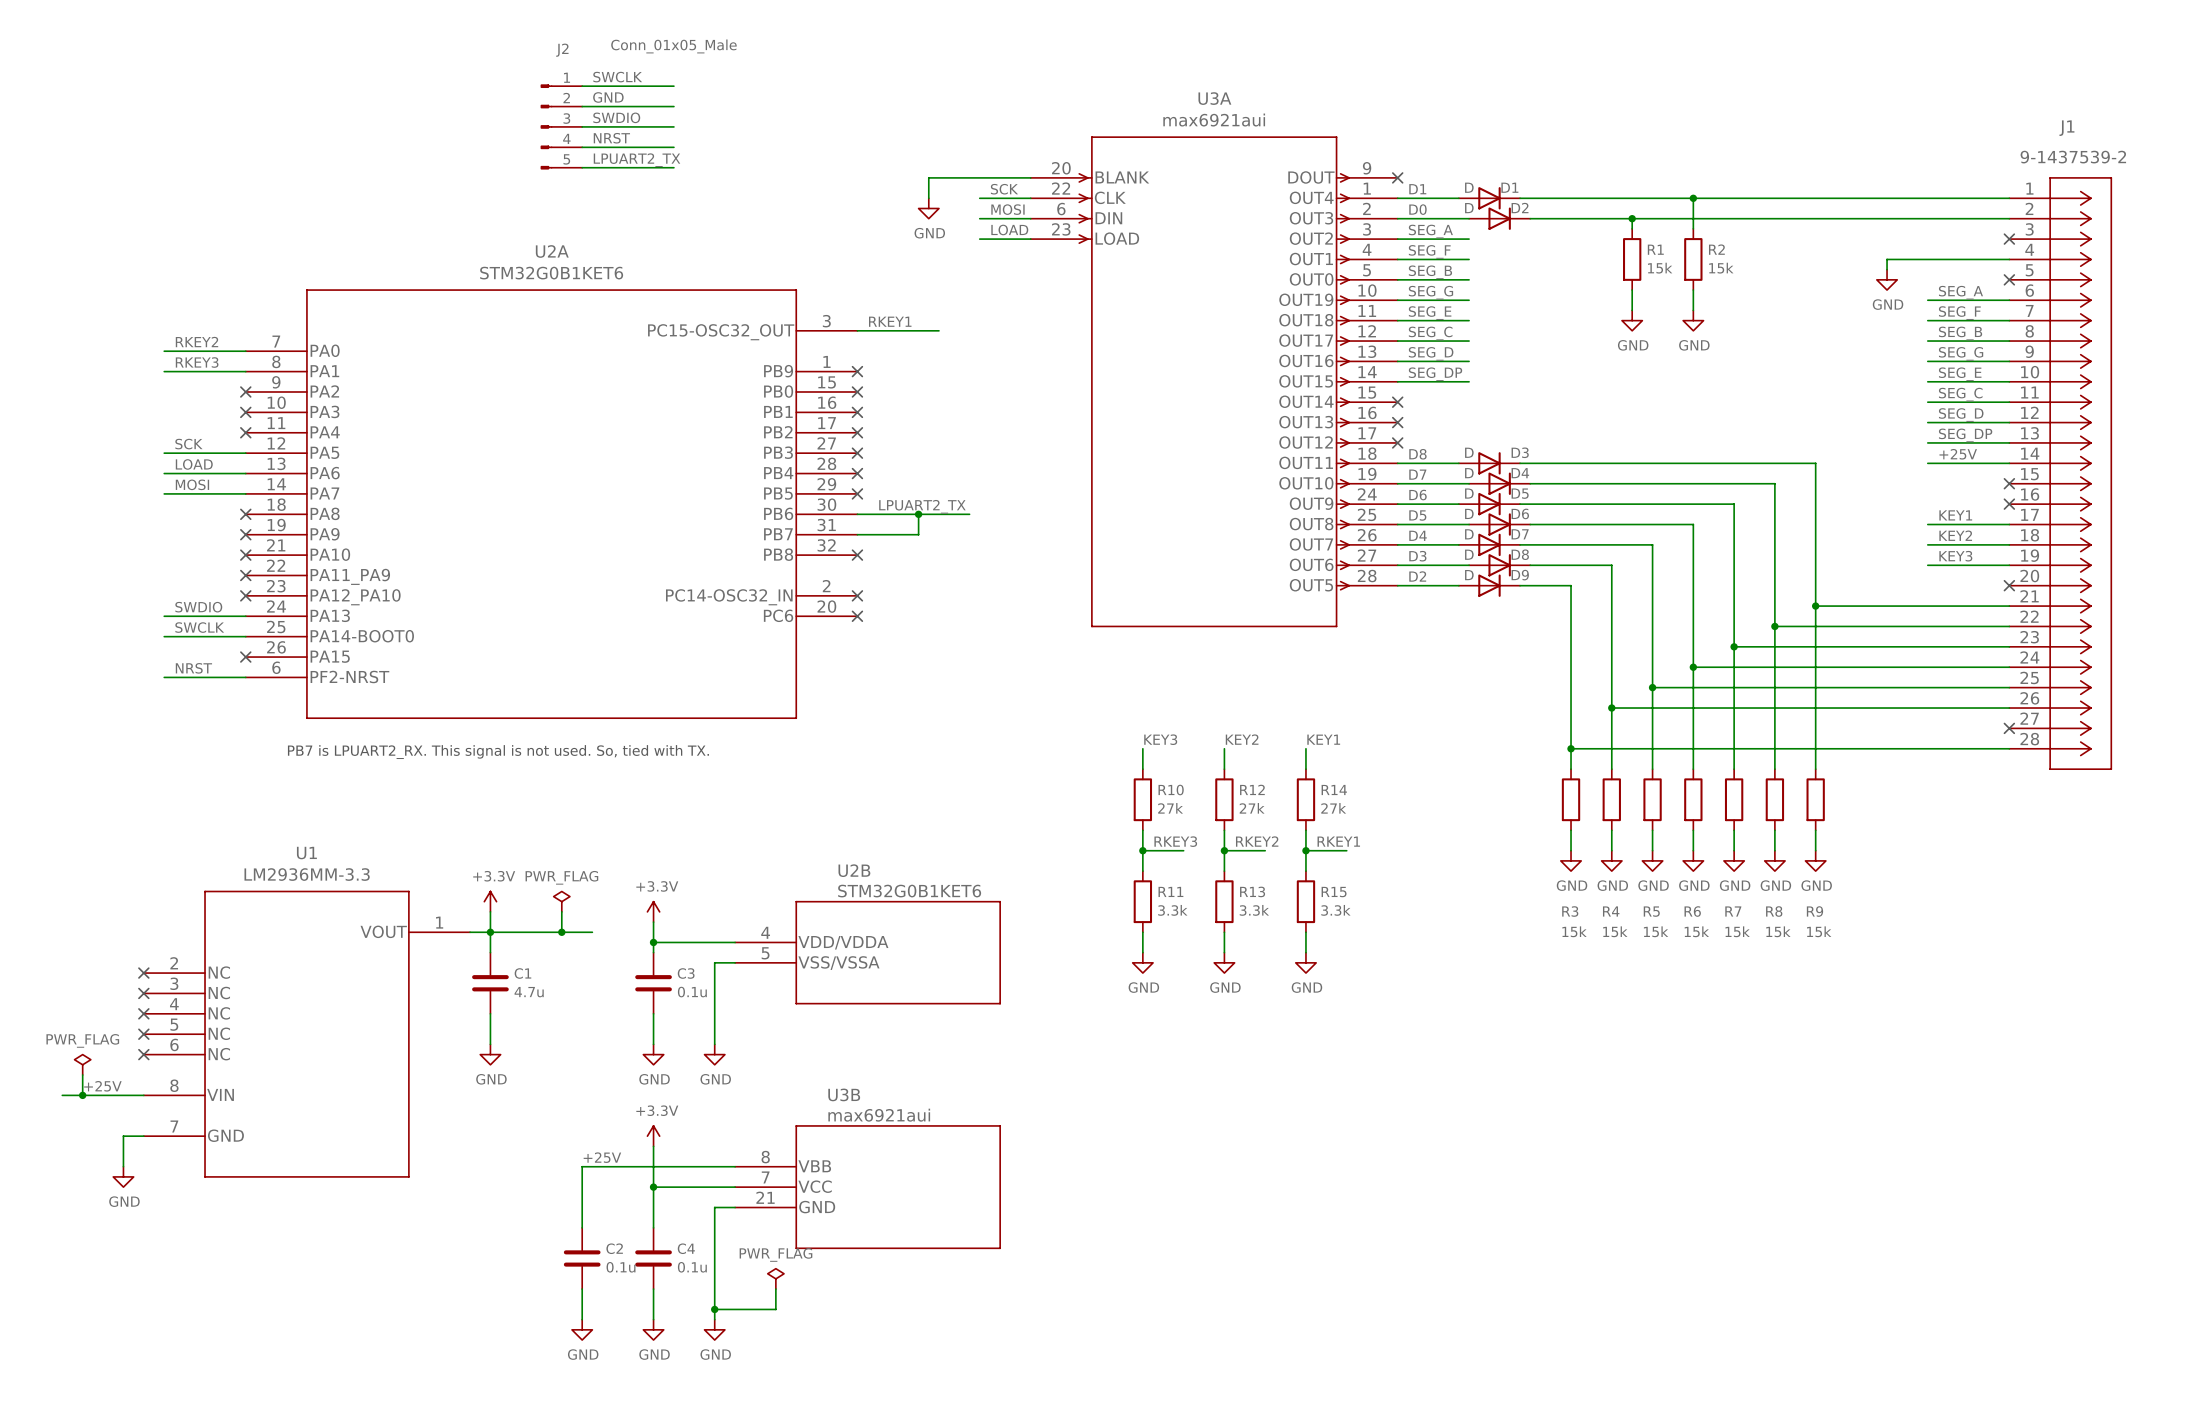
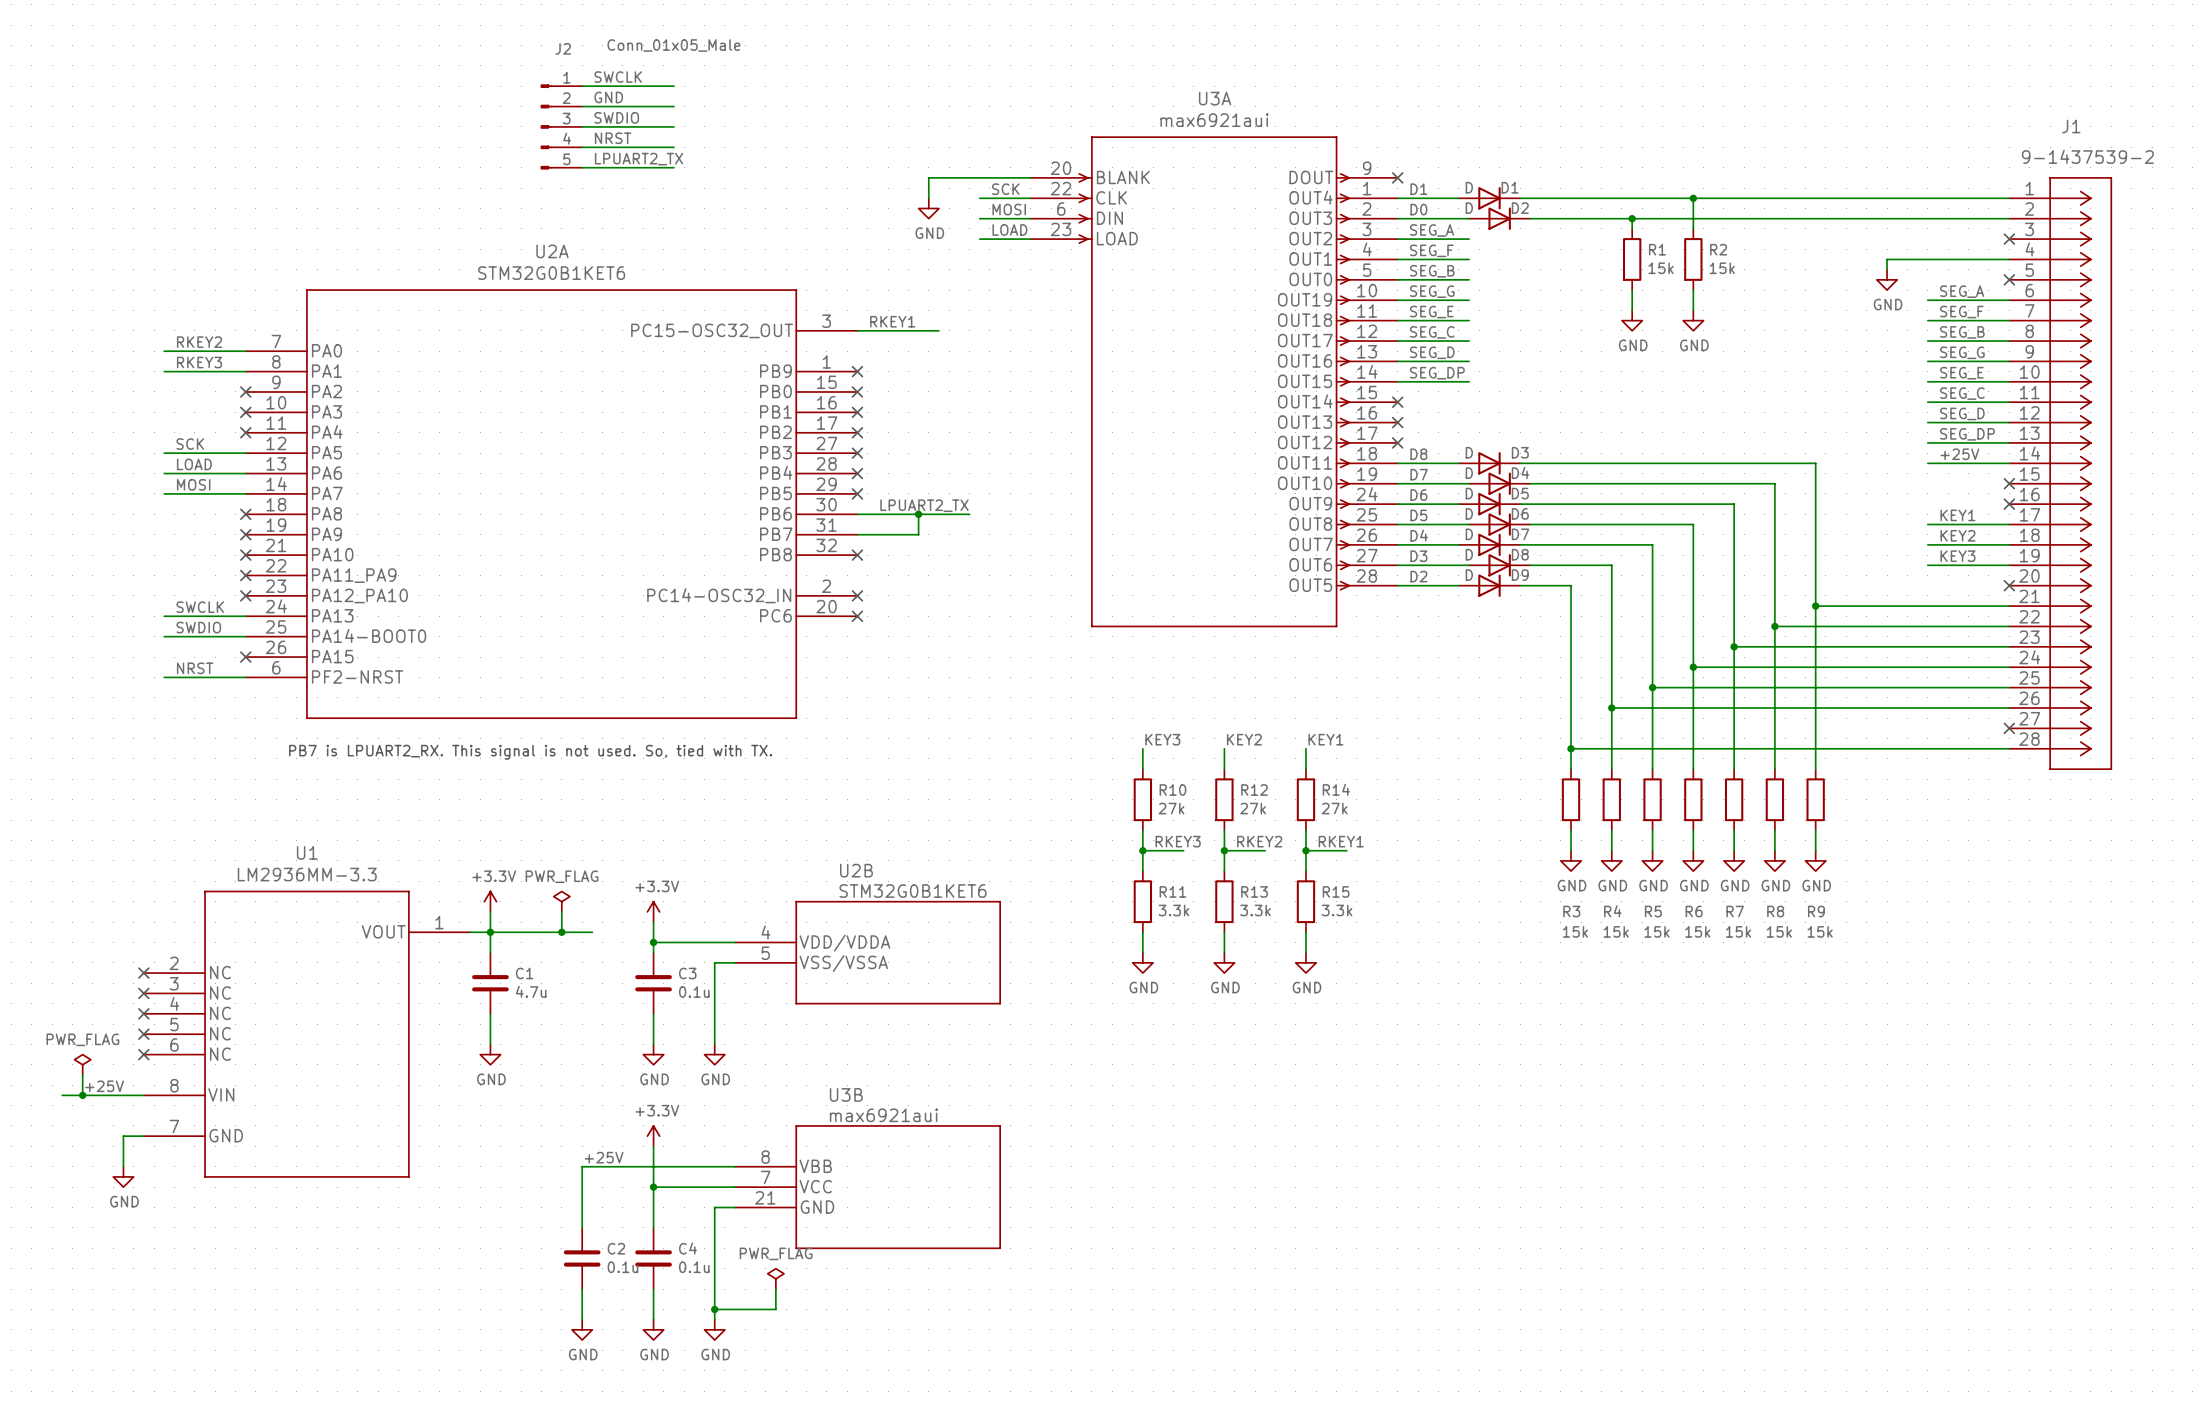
label: SWDIO (198, 607) -> SWCLK (200, 607)
label: SWCLK (199, 627) -> SWDIO (198, 627)

